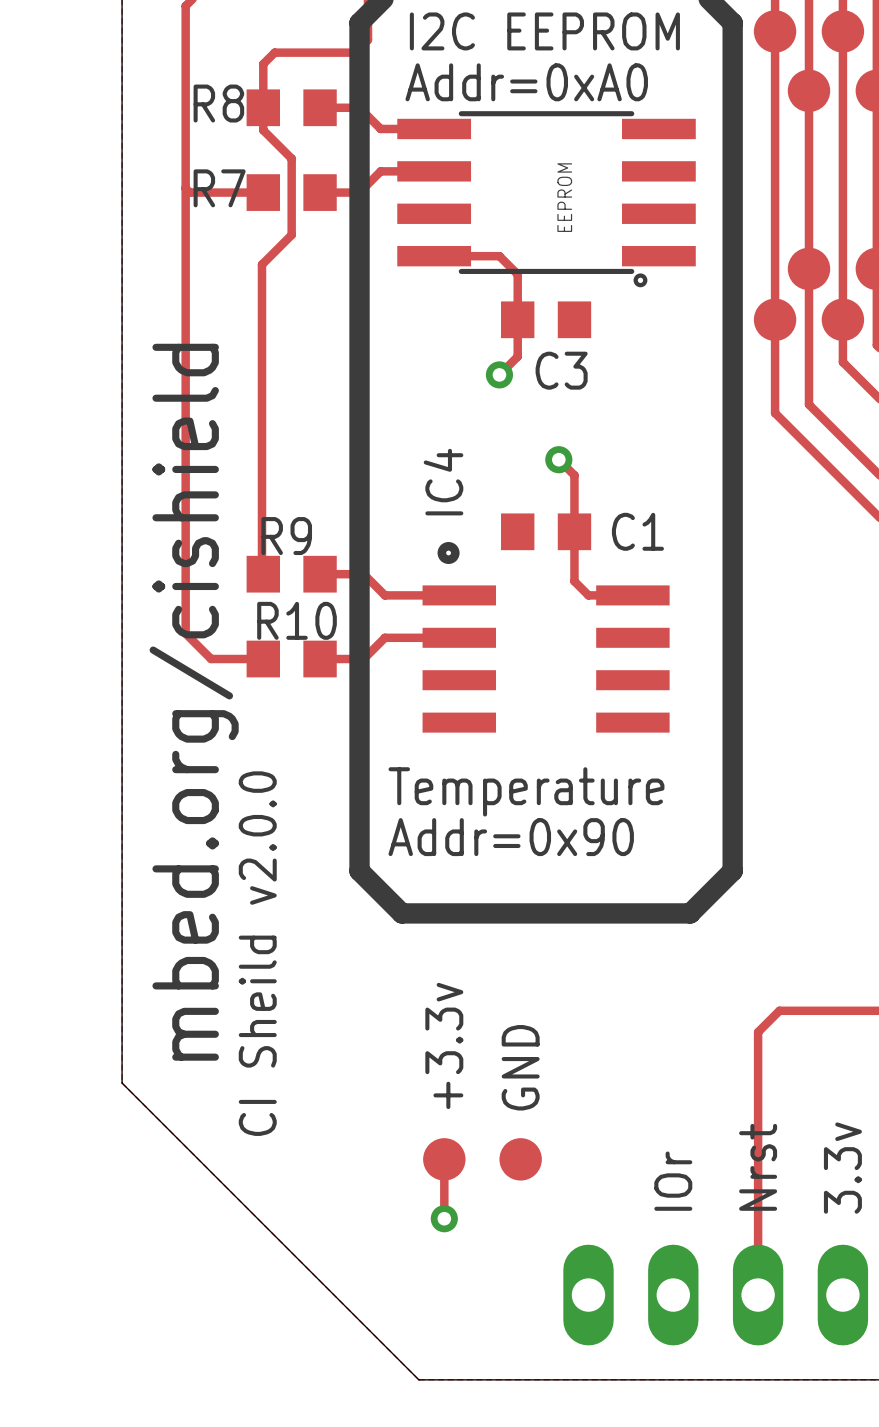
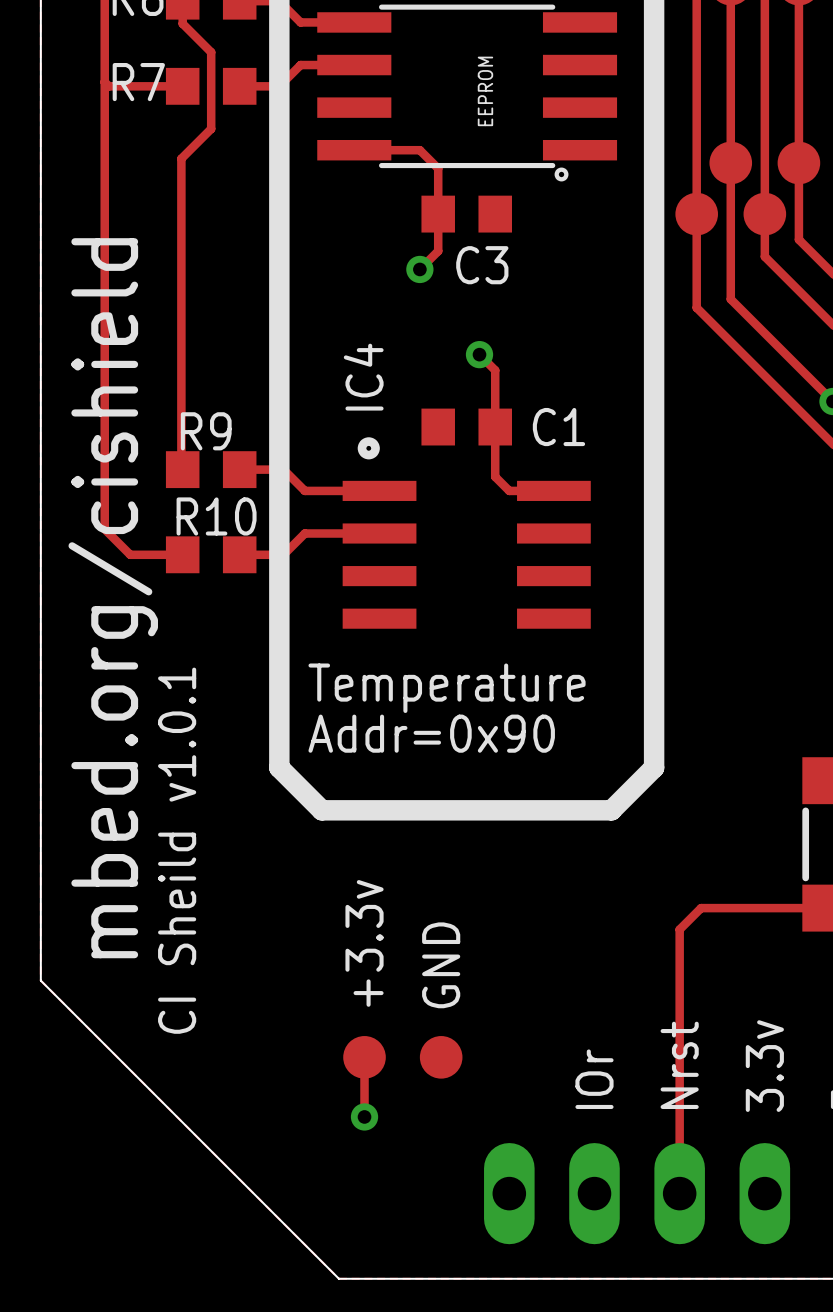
text: CI Sheild v2.0.0 (257, 953) -> CI Sheild v1.0.1 (177, 850)

